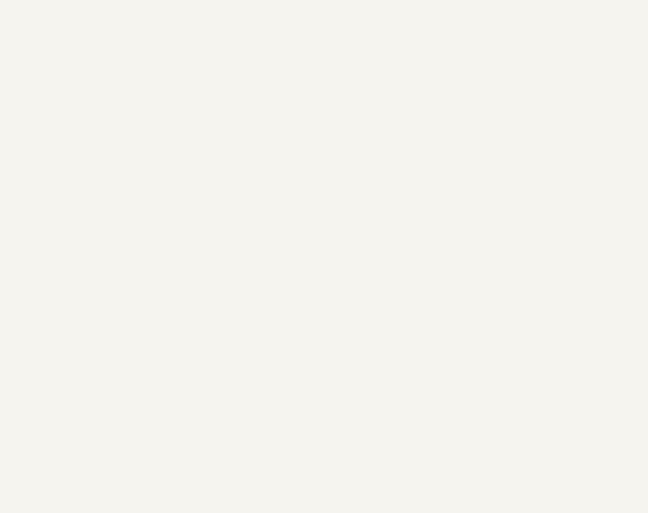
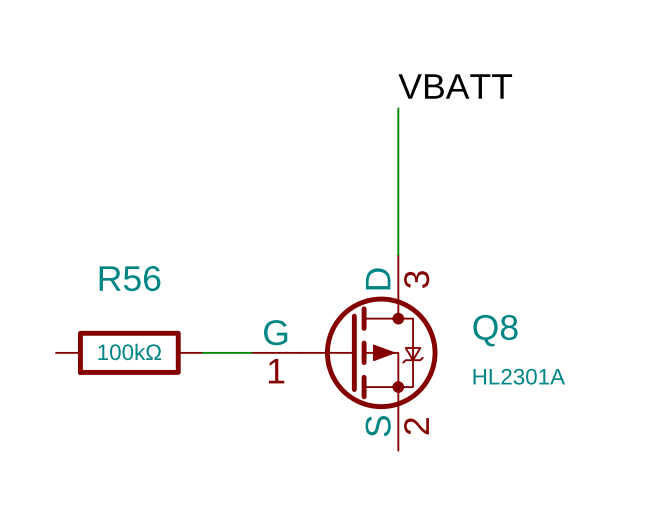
label: none -> VBATT (455, 86)
wire: none -> (398, 108) (398, 255)
R56: none -> 100kΩ (129, 352)
wire: none -> (202, 352) (251, 352)
Q8: none -> HL2301A (344, 352)

